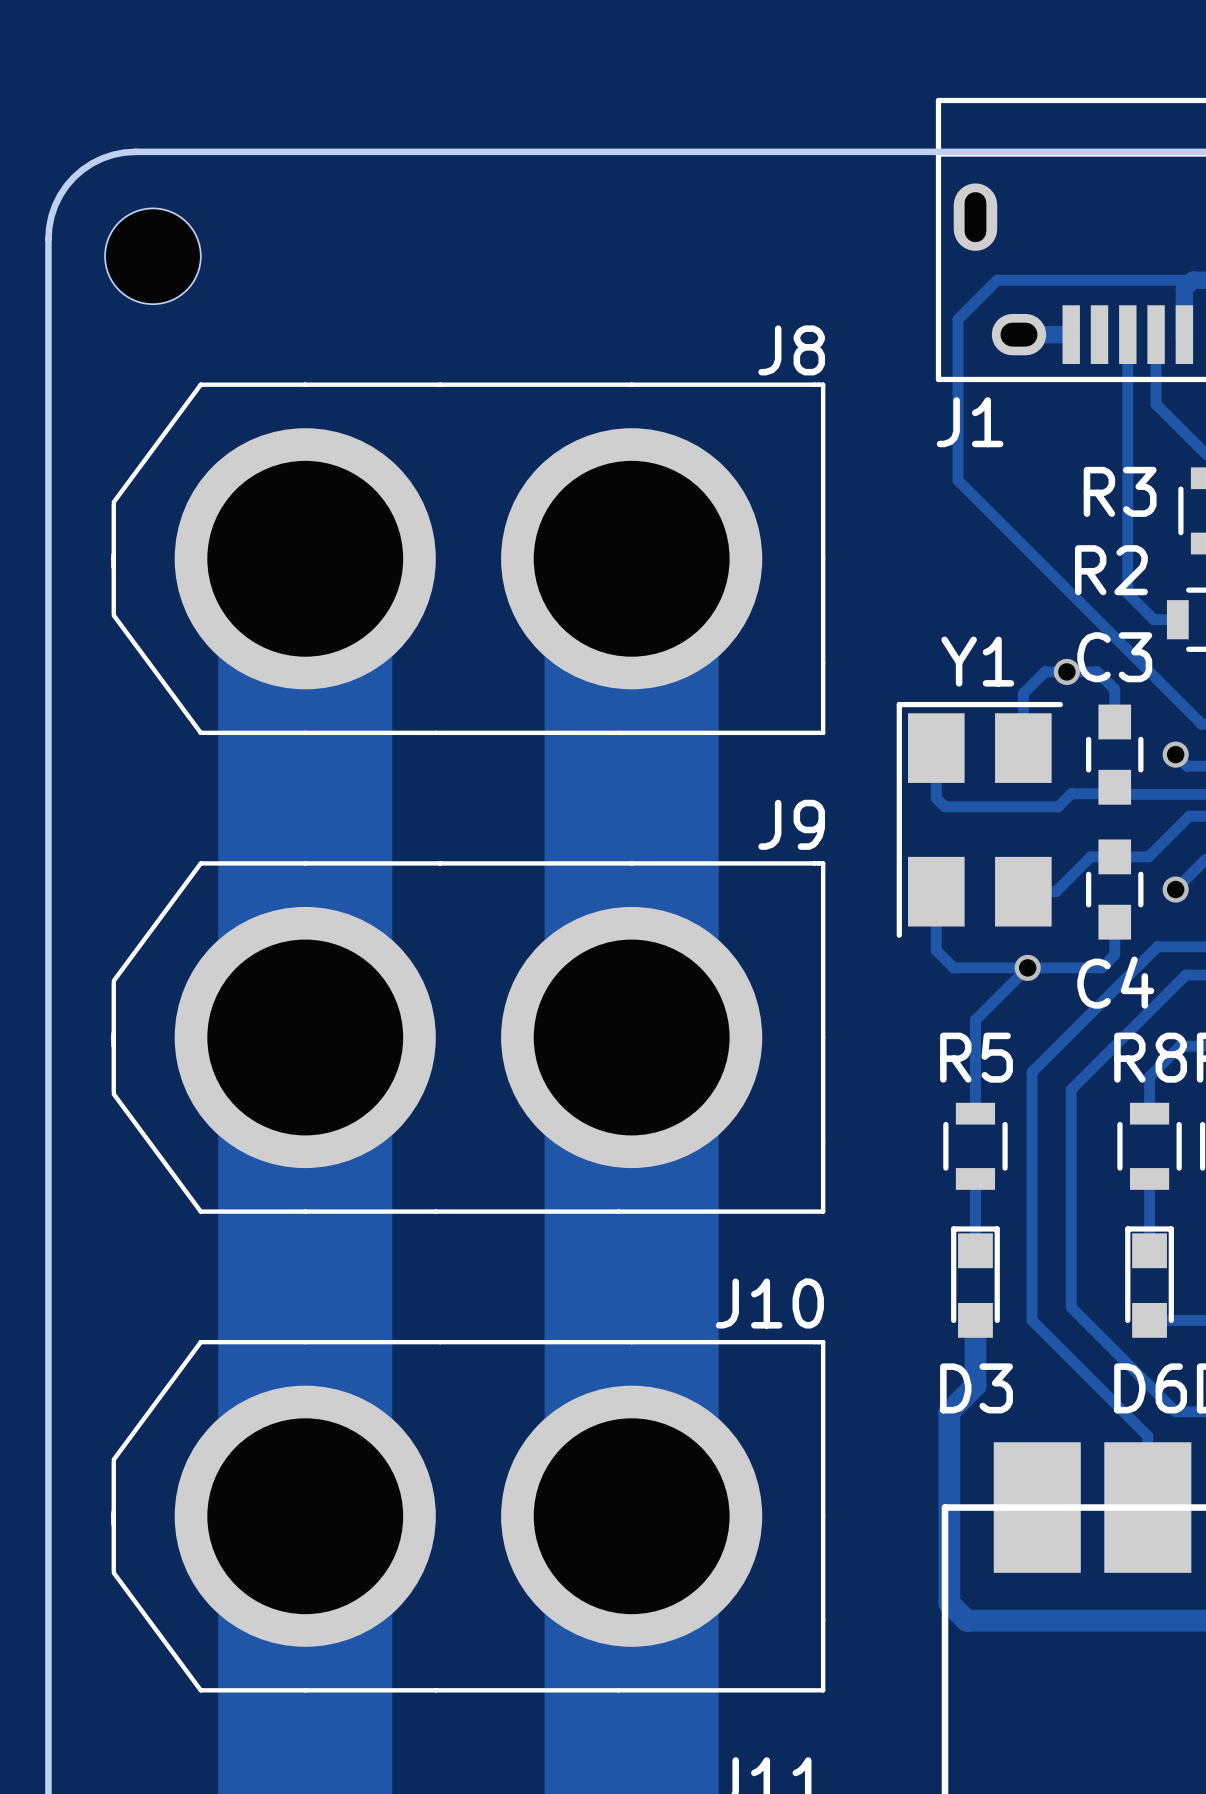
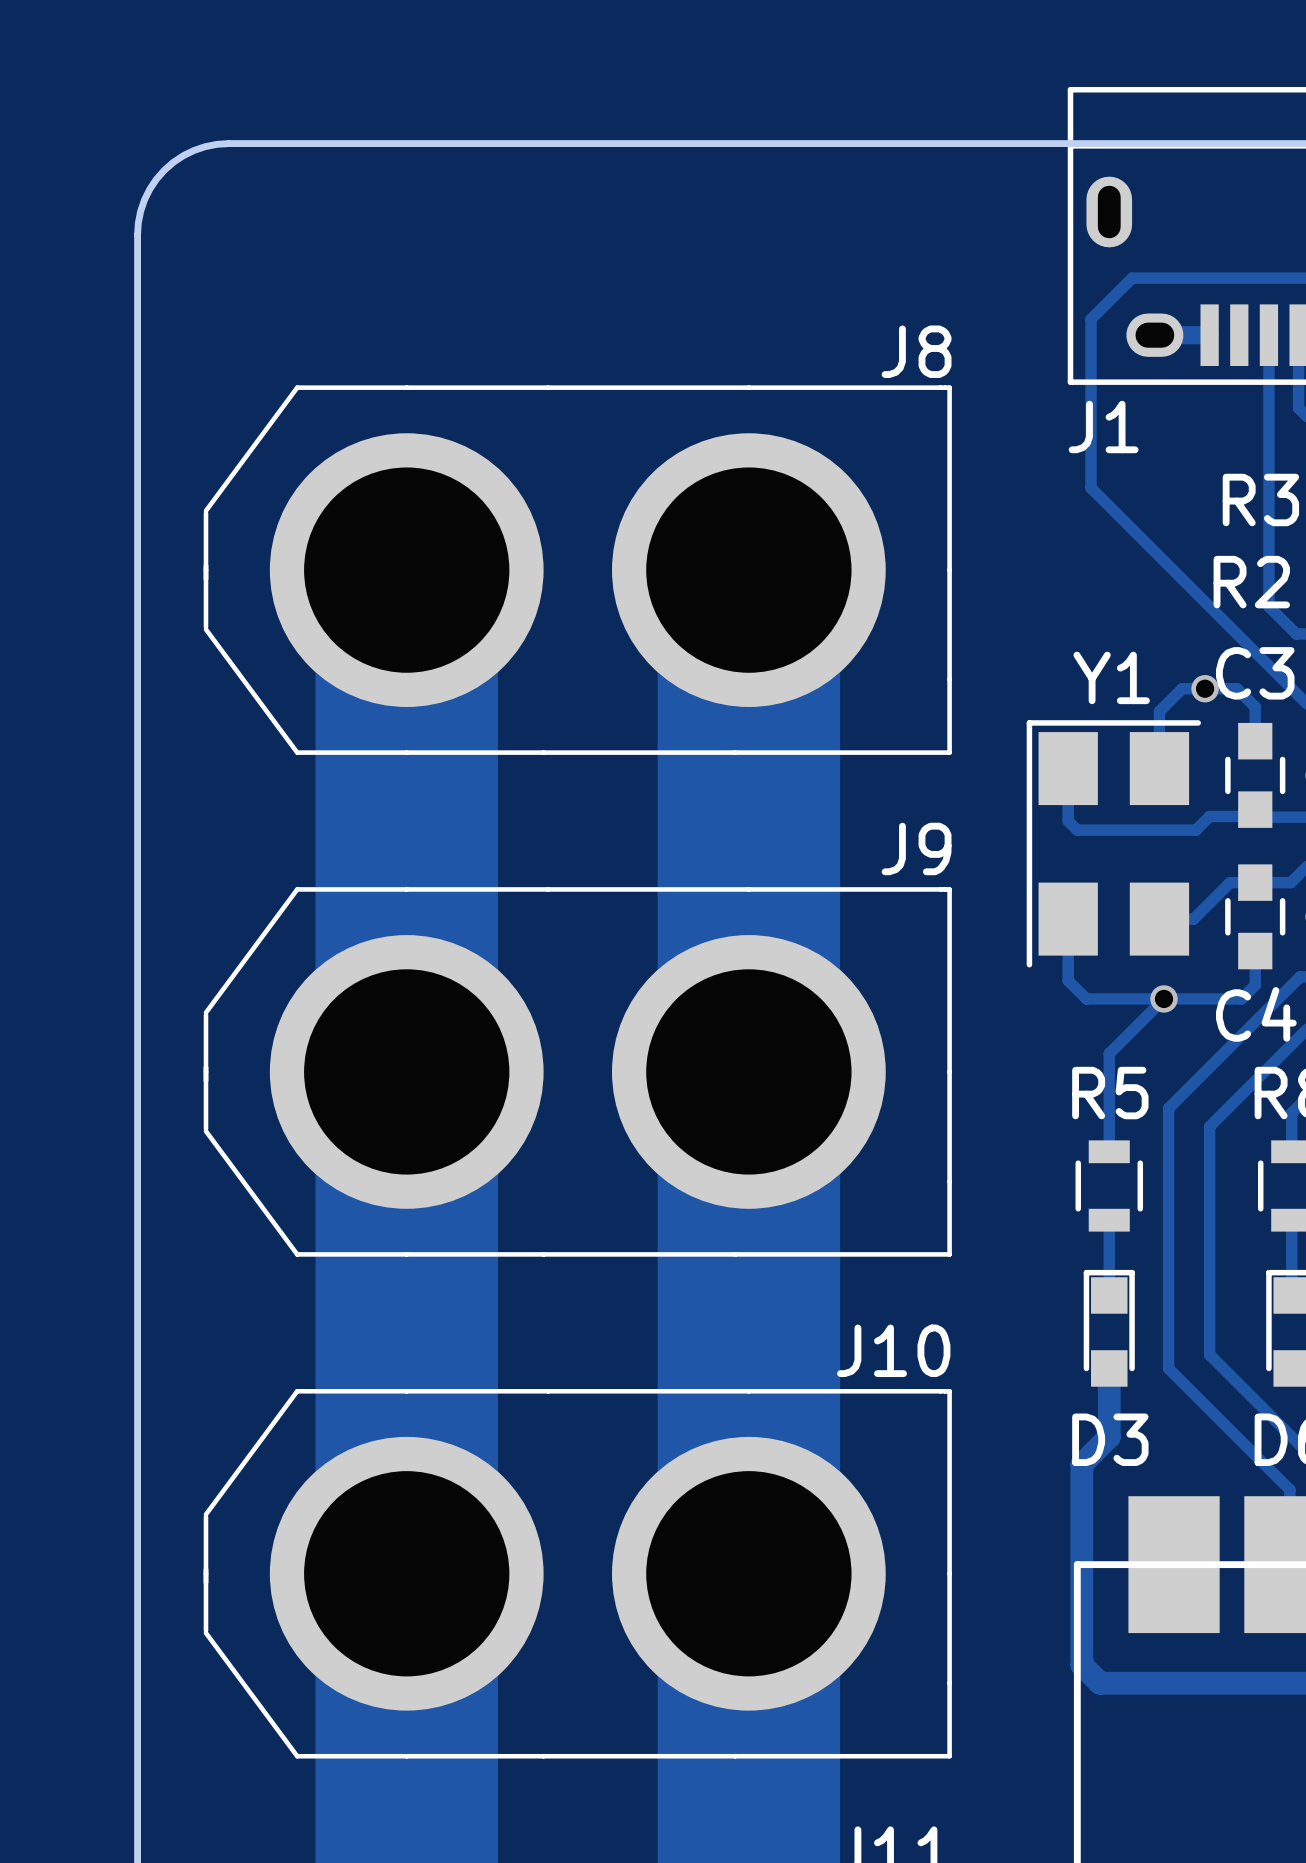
part: (152, 256) -> none

